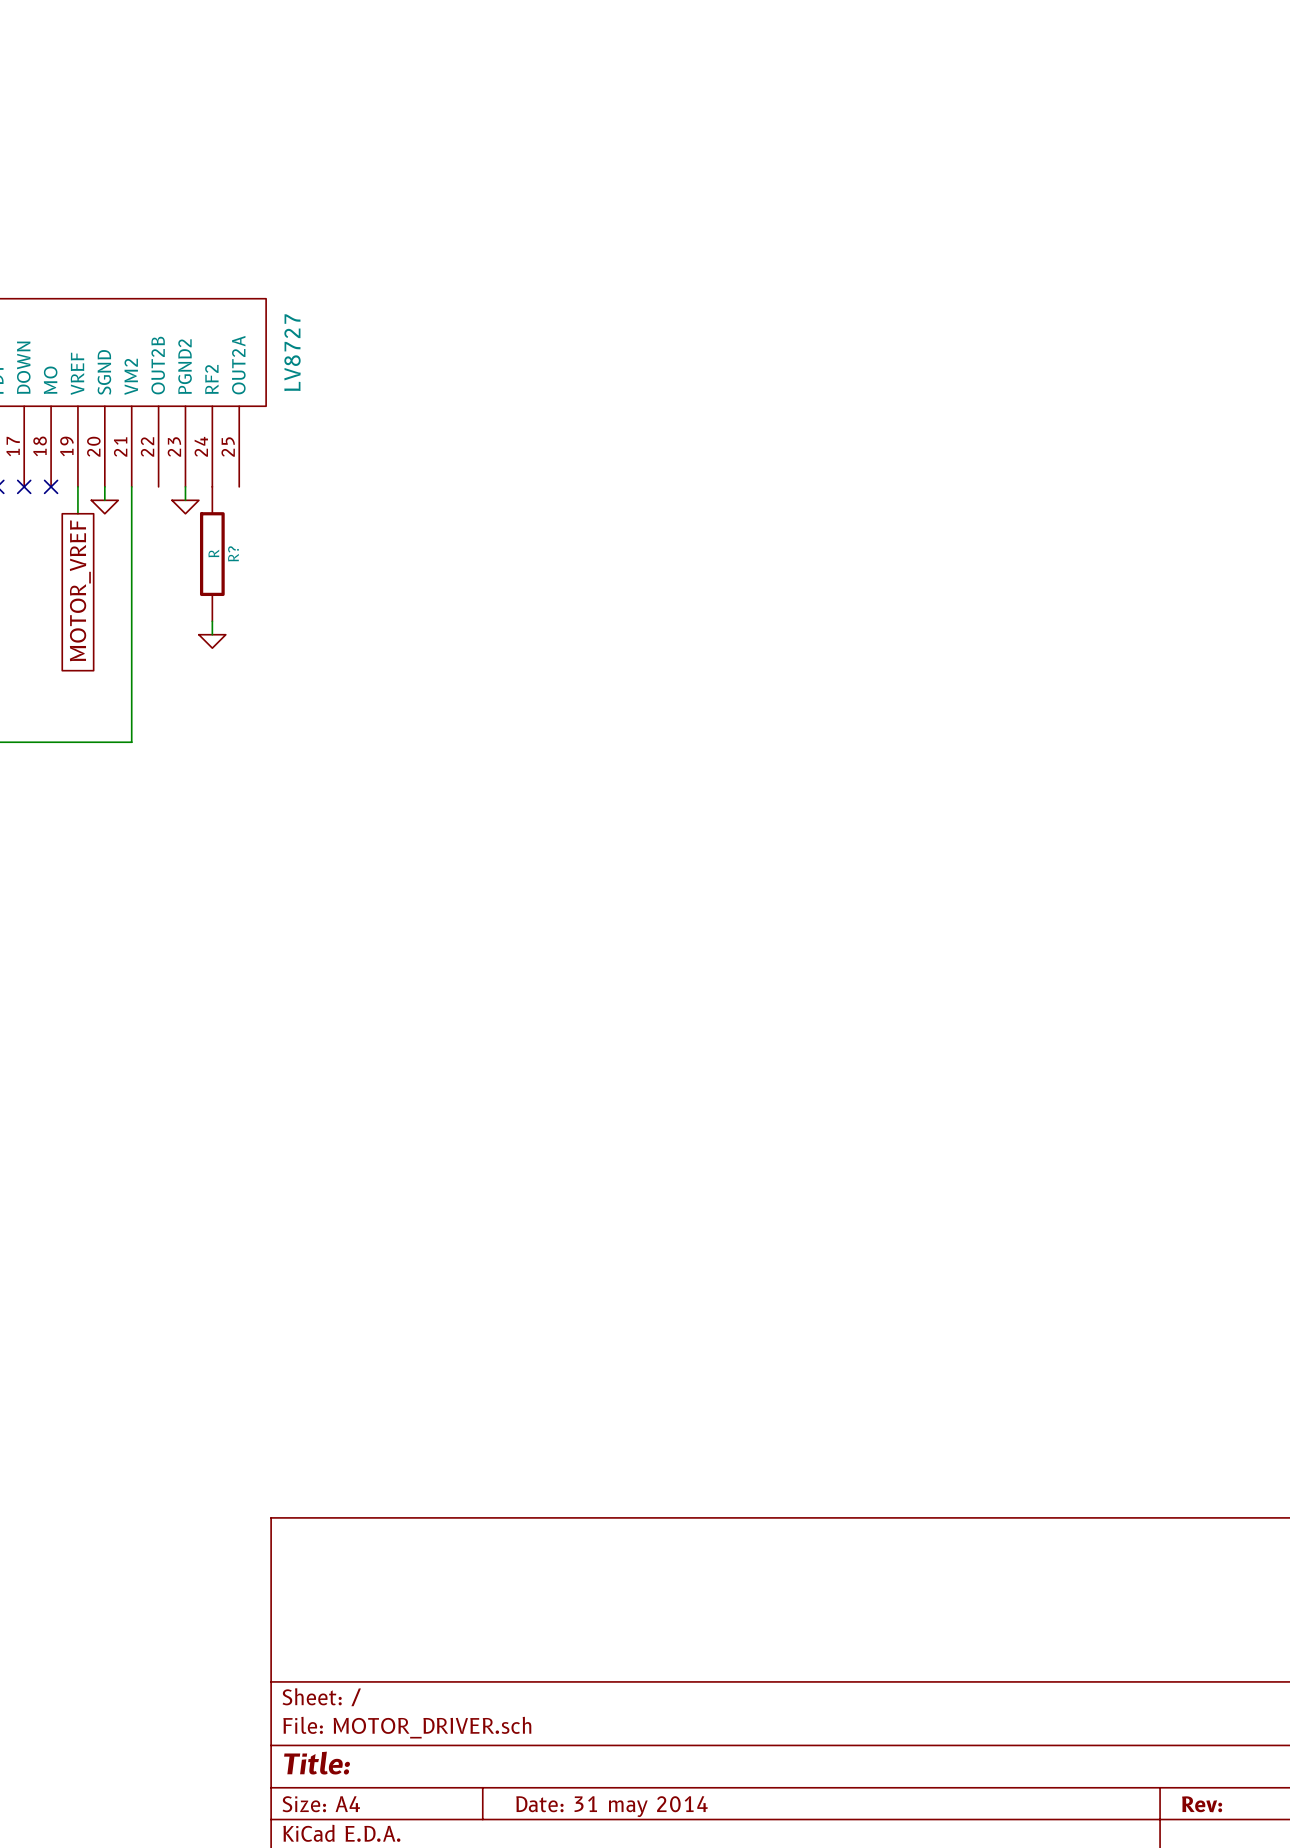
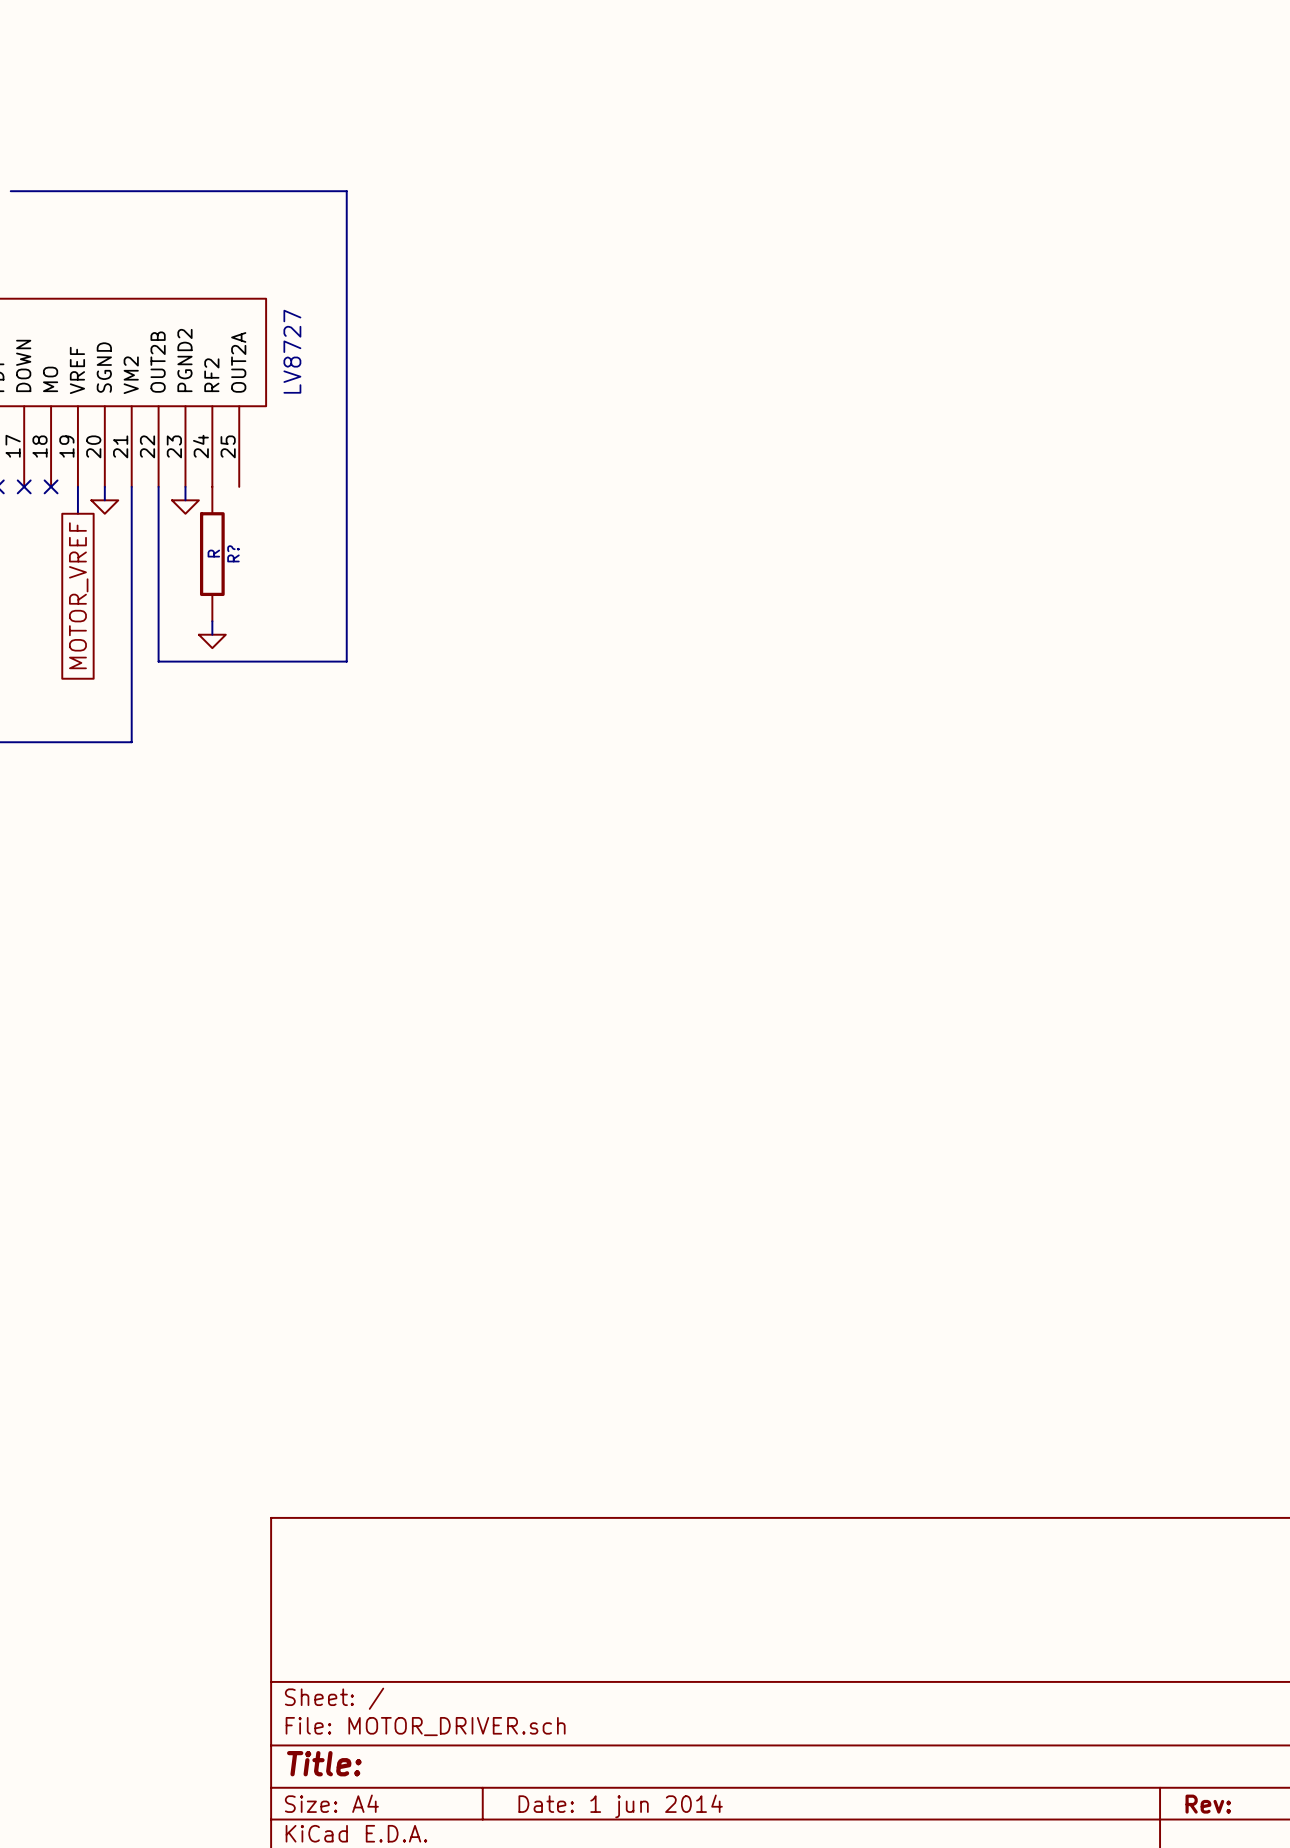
wire: none -> (10, 191) (346, 191) (346, 661) (158, 661) (158, 486)
title block: Date: 31 may 2014 (612, 1806) -> Date: 1 jun 2014 (620, 1806)

